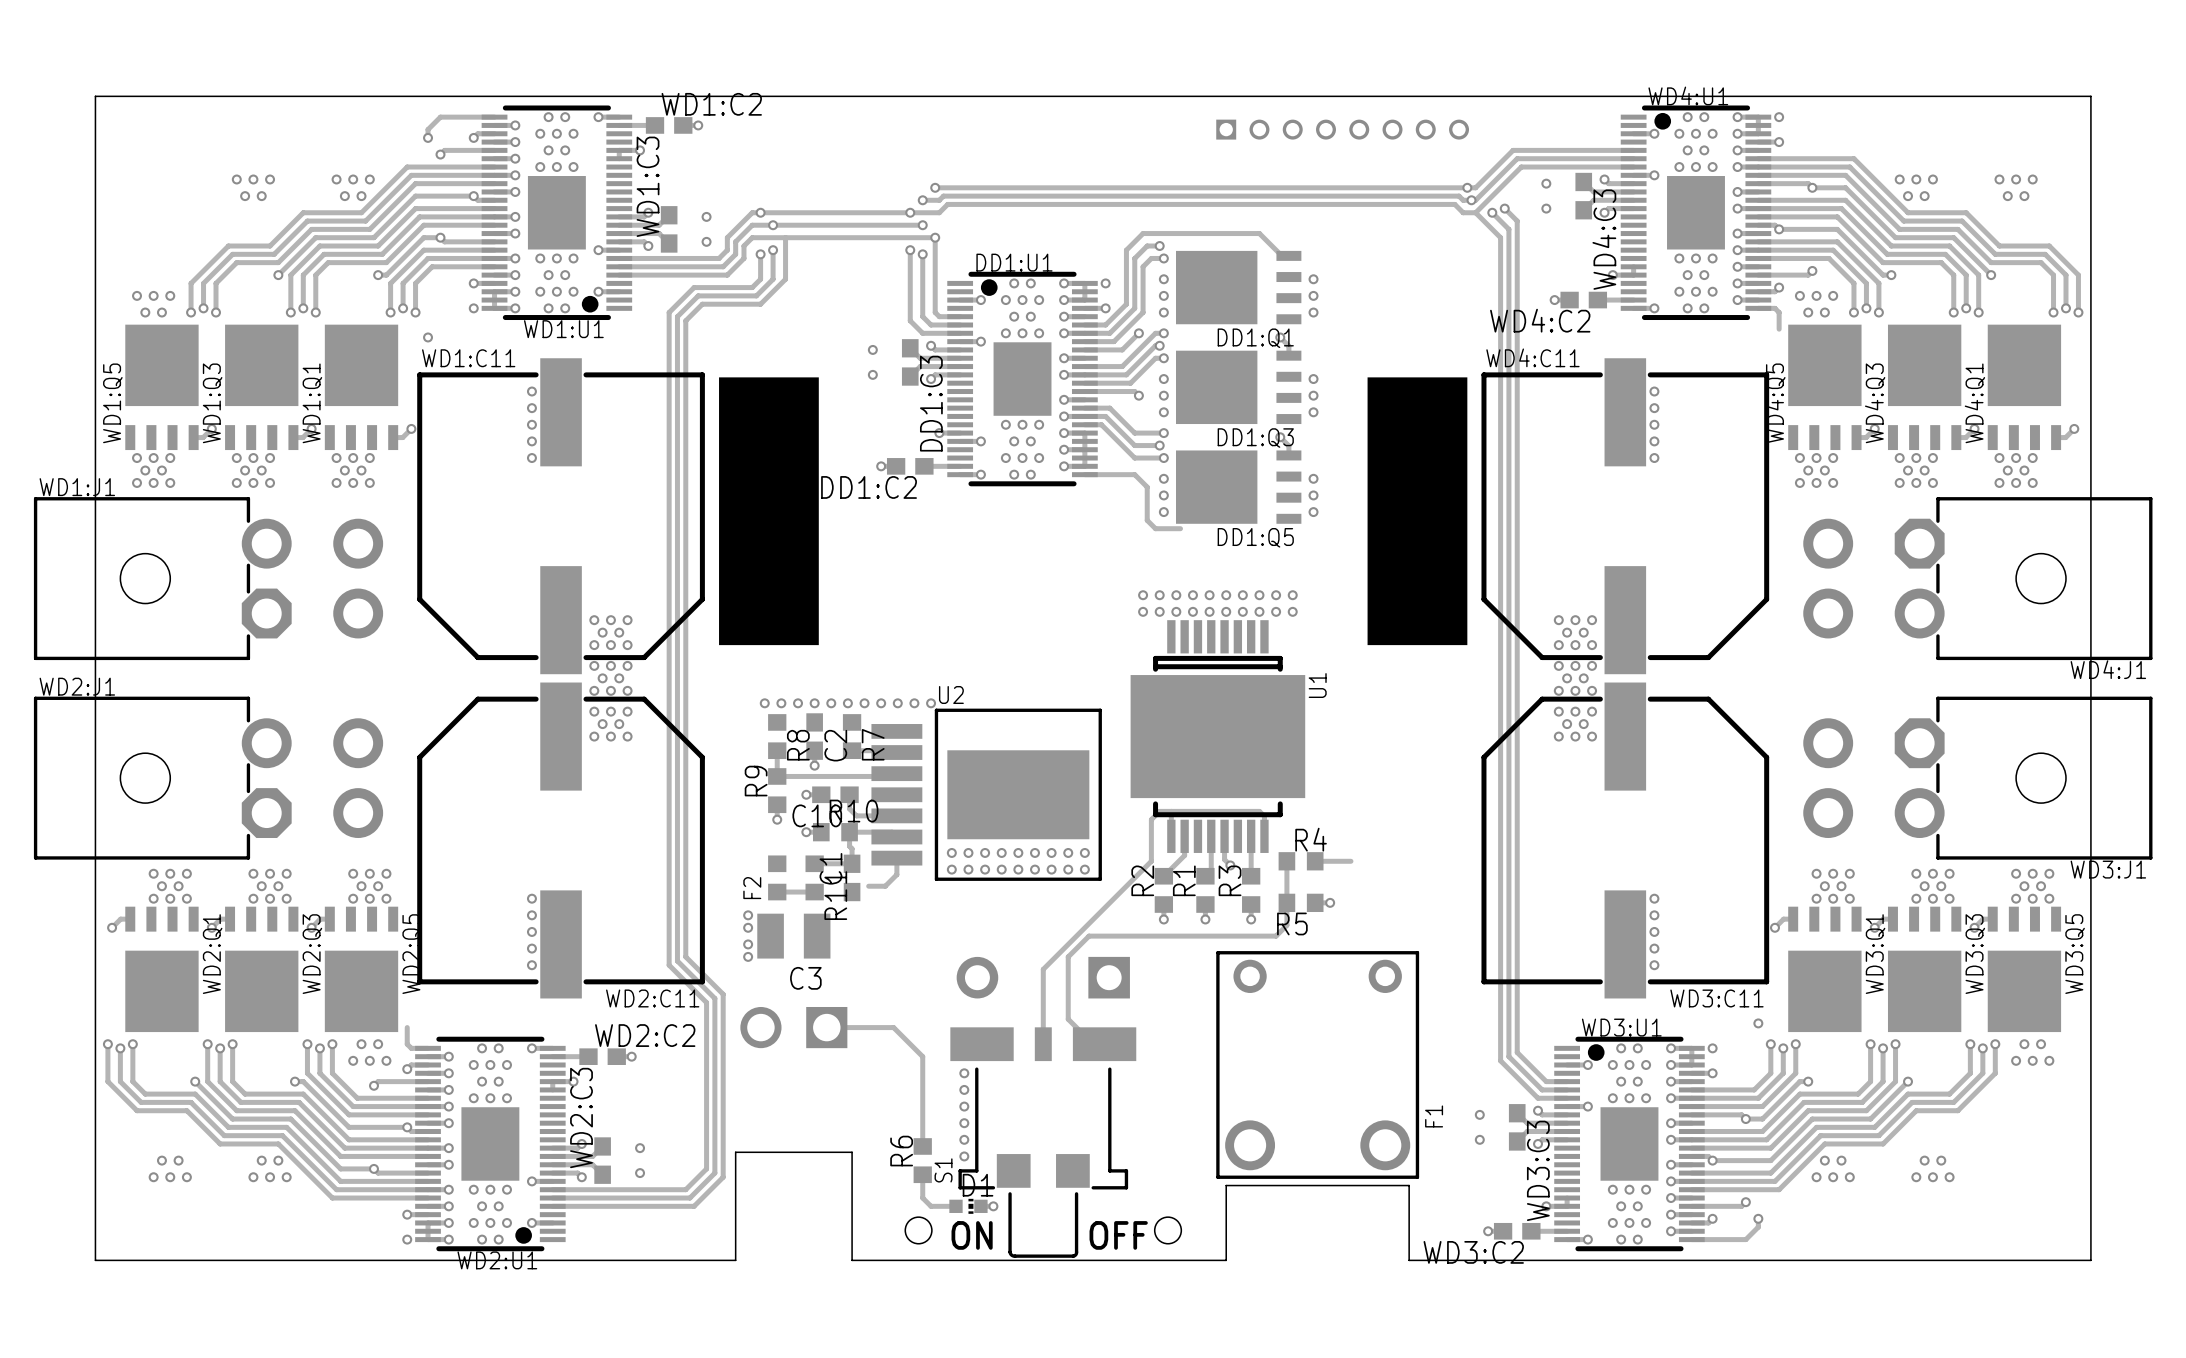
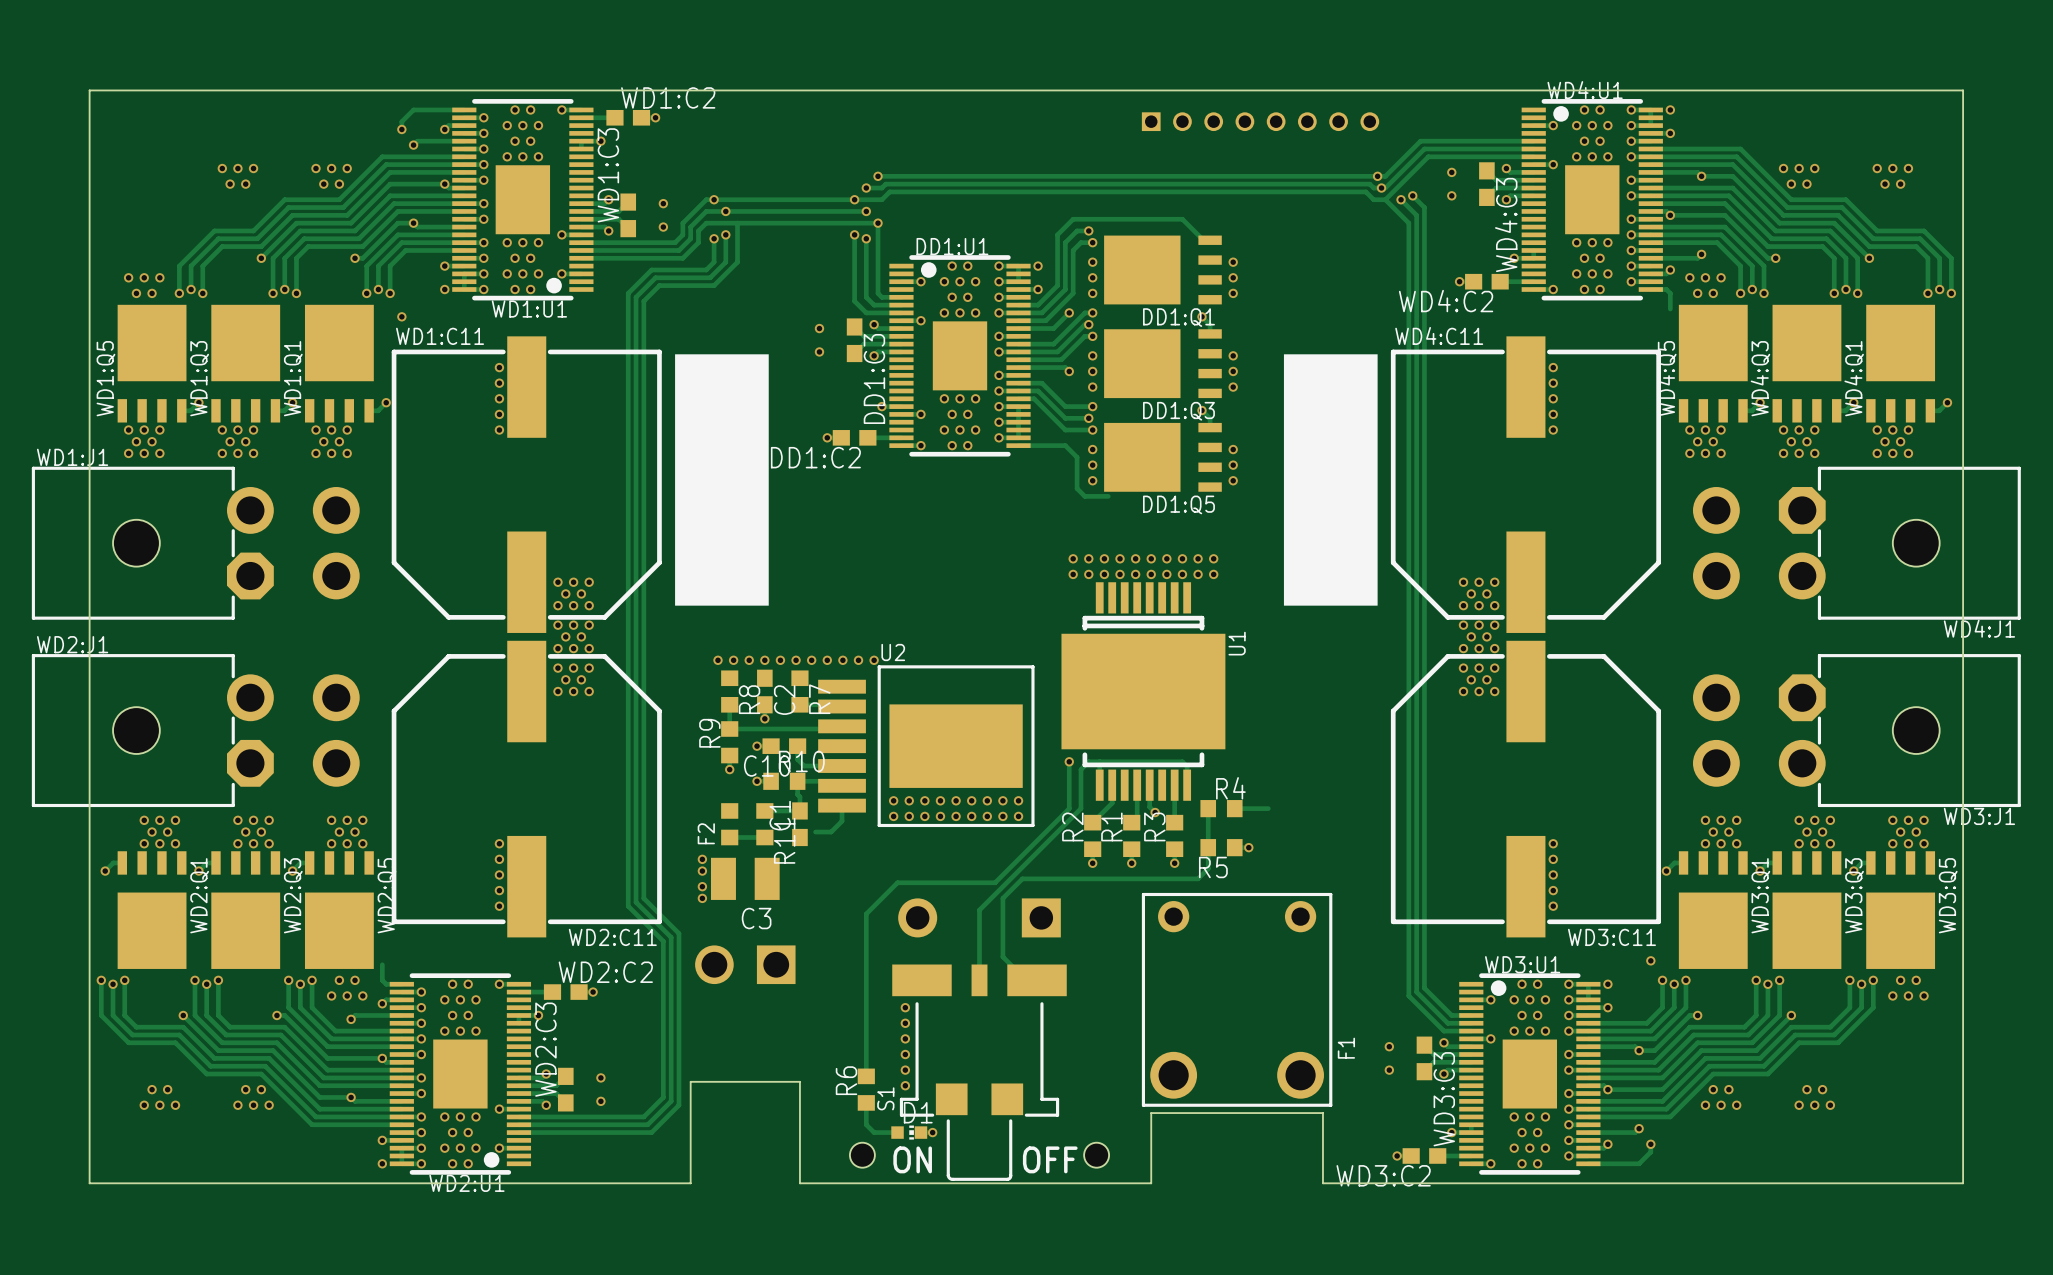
via: none -> (1069, 761)
track: (826, 1027) (893, 1027) (922, 1056) -> (1069, 761) (1069, 808) (995, 882) (897, 882) (866, 914) (866, 992)

